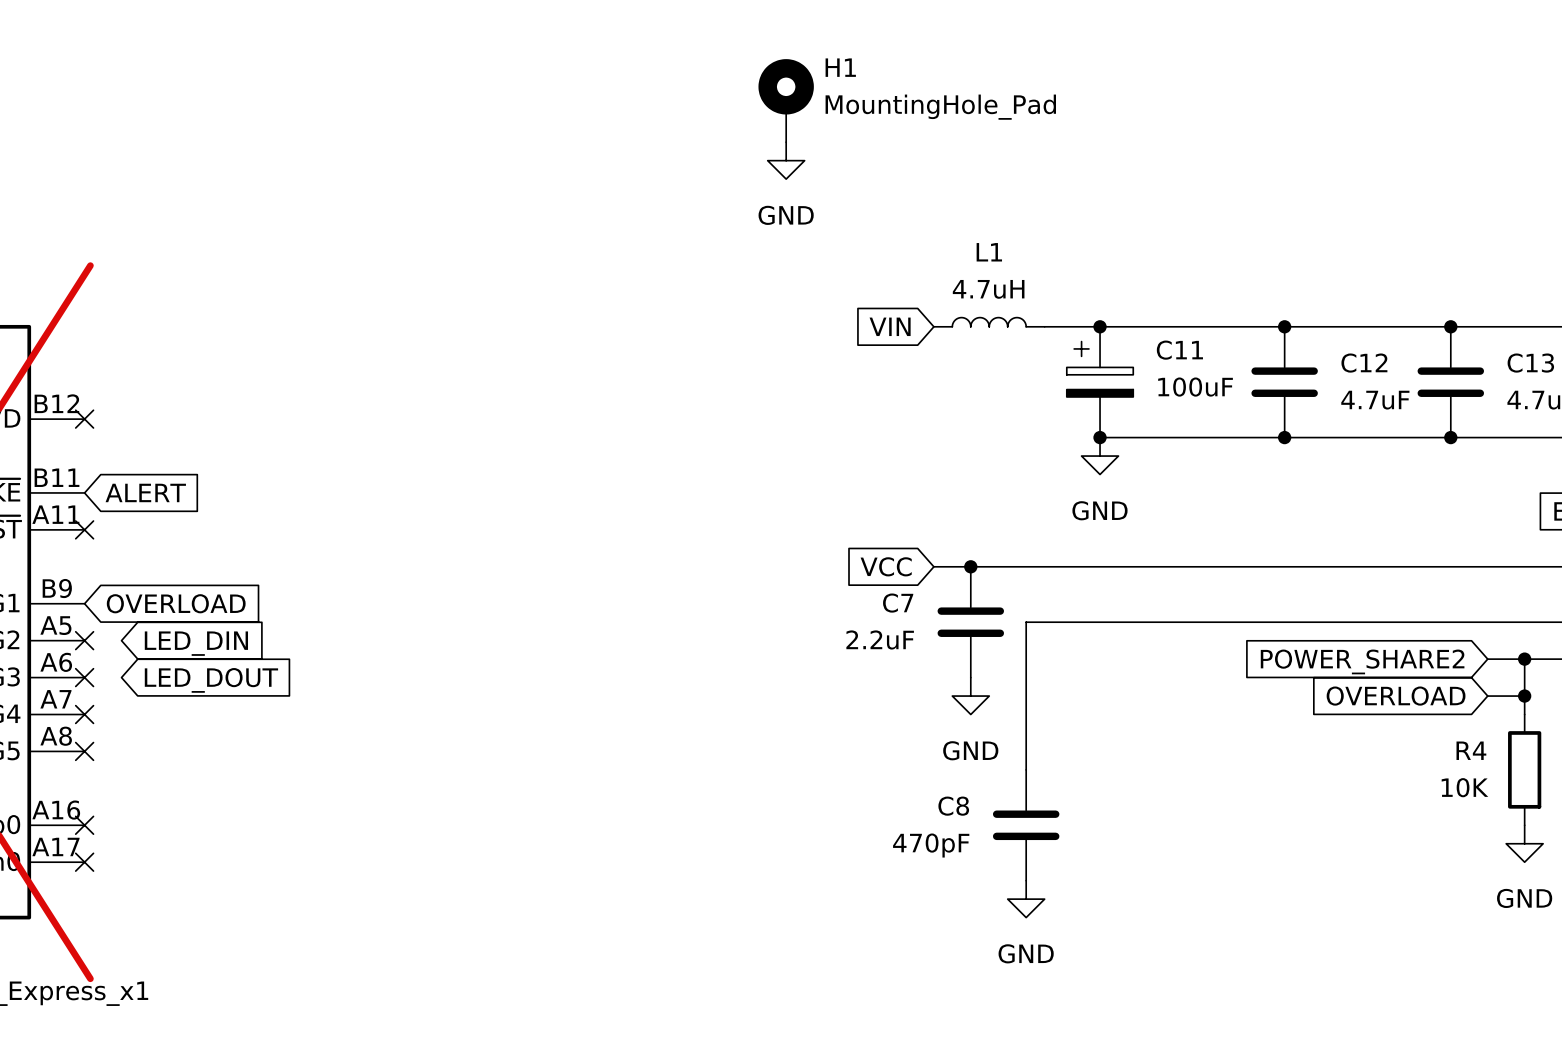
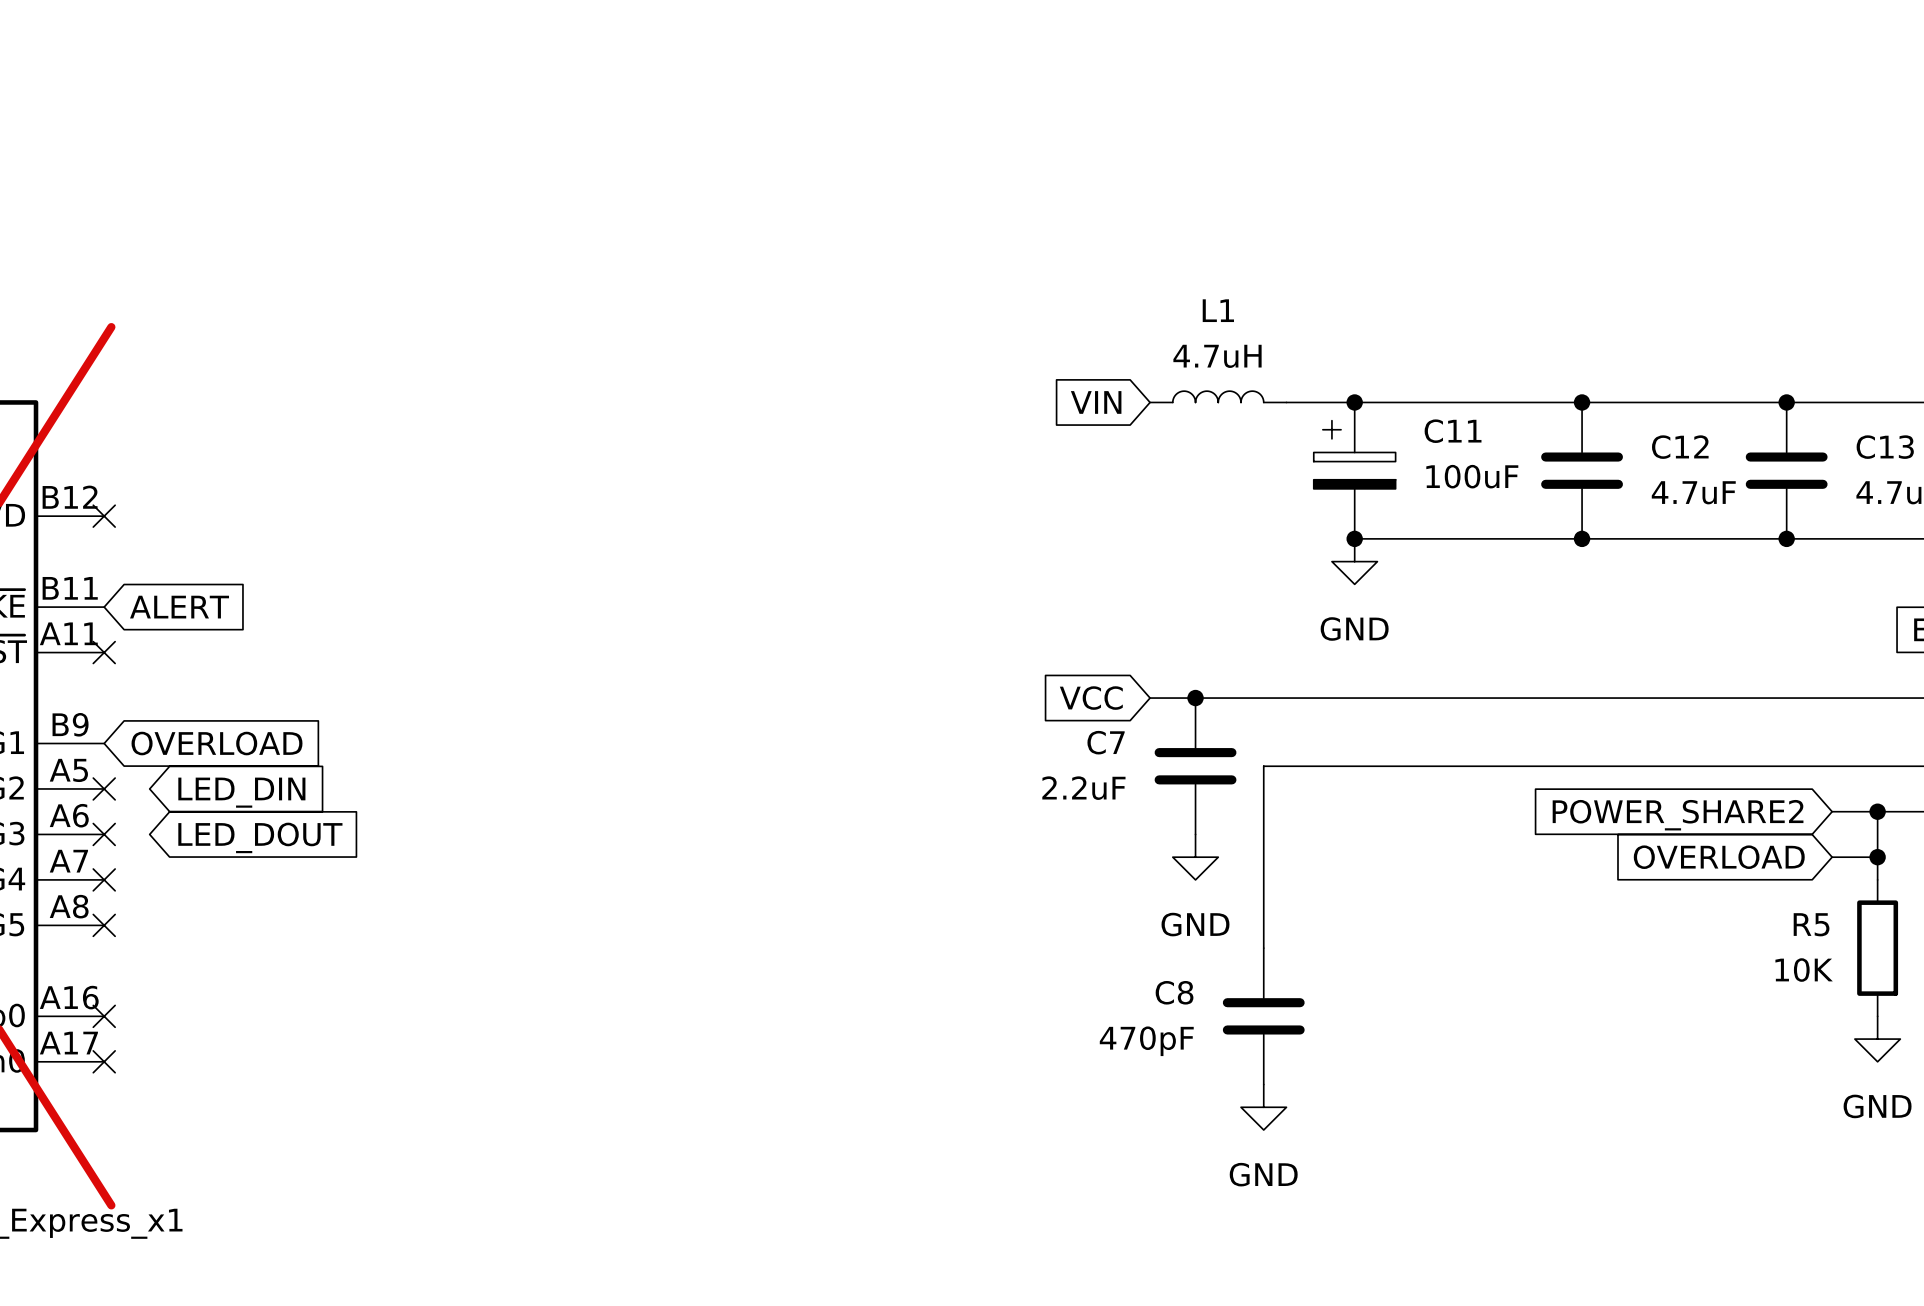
H1: MountingHole_Pad (786, 100) -> none
power symbol: GND (786, 160) -> none
R4 name: R4 (1471, 750) -> R5 (1811, 924)

